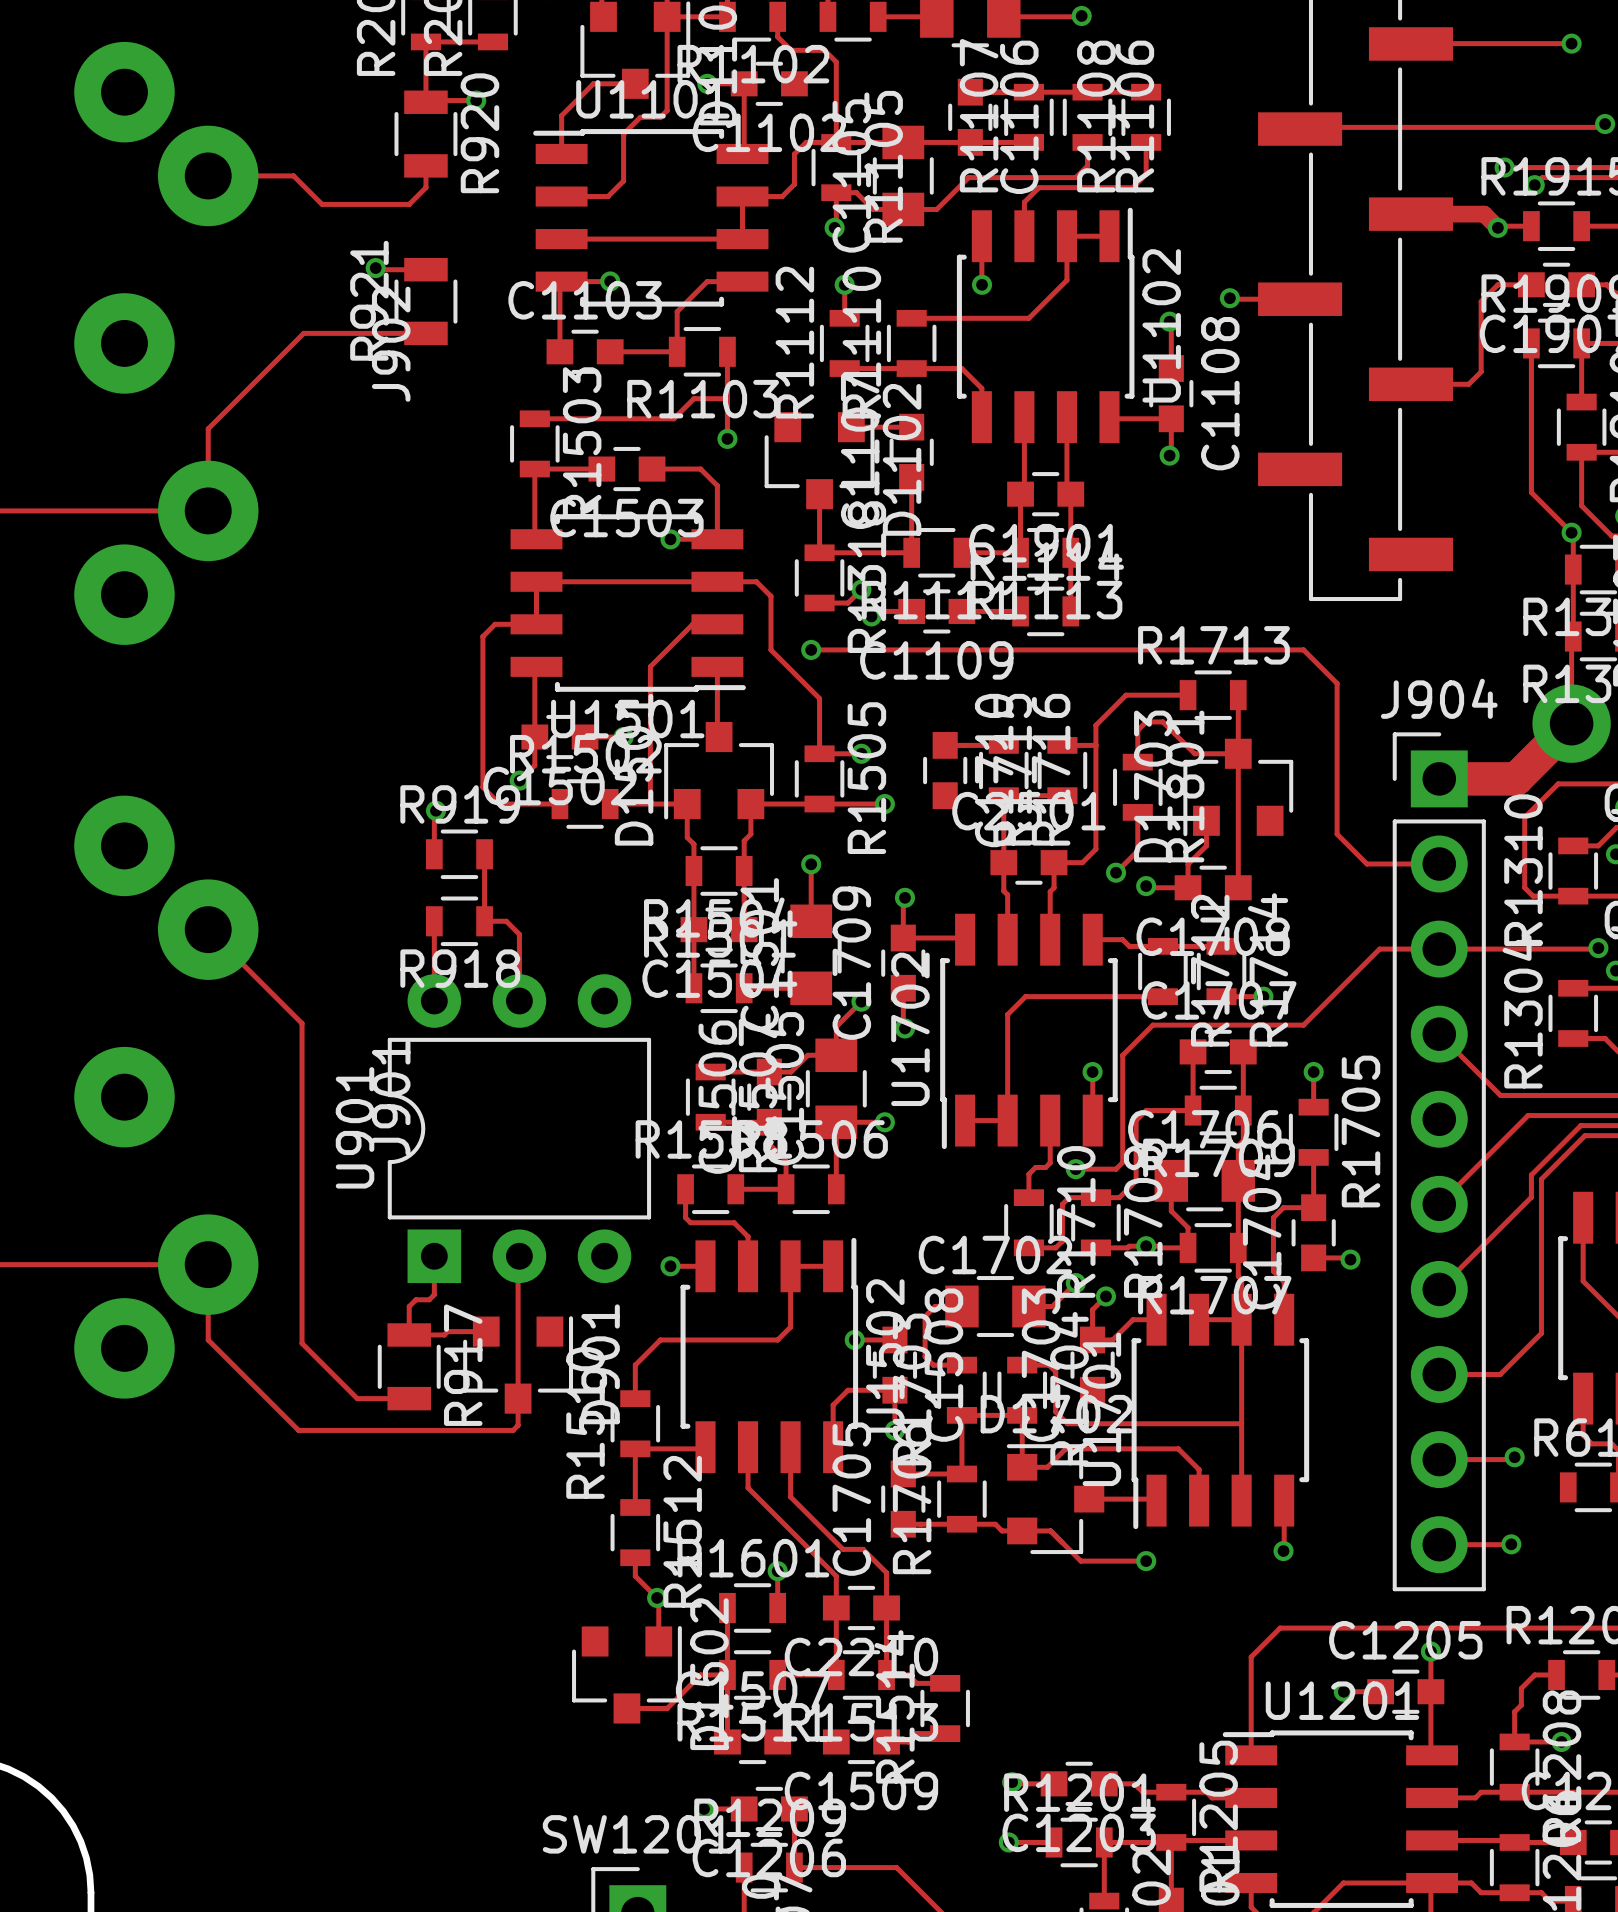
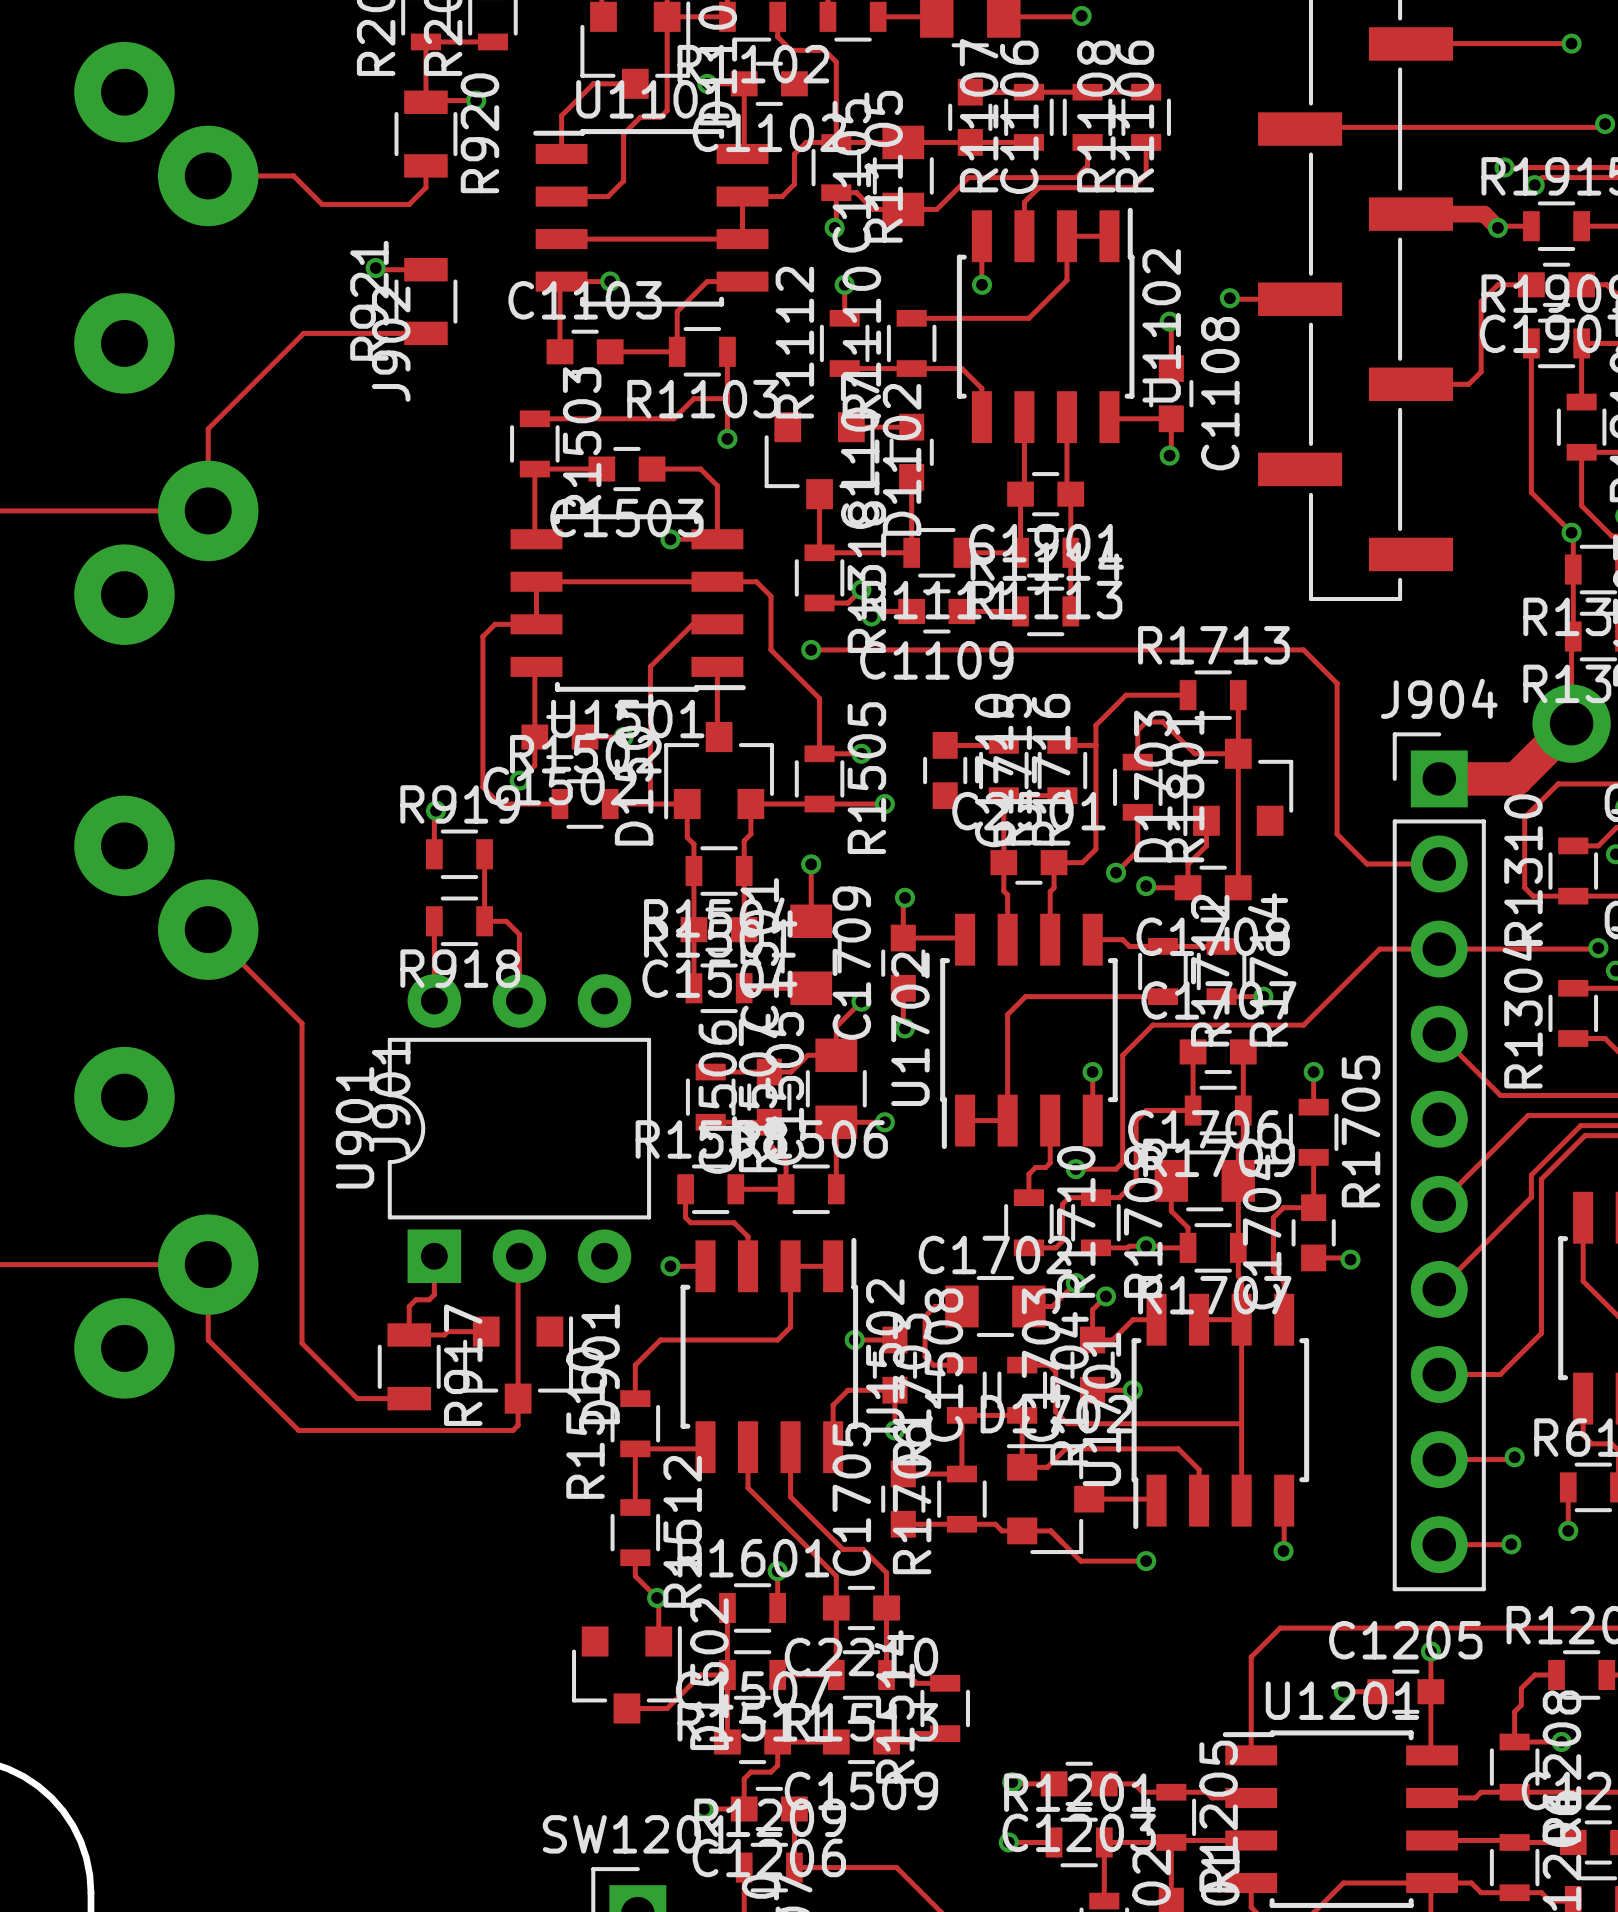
track: none -> (1092, 1390) (1132, 1390)
via: none -> (1132, 1390)
track: none -> (1568, 1487) (1568, 1530)
via: none -> (1568, 1530)
track: none -> (836, 1741) (777, 1741) (777, 1765) (770, 1772) (750, 1772) (744, 1778) (744, 1808)

